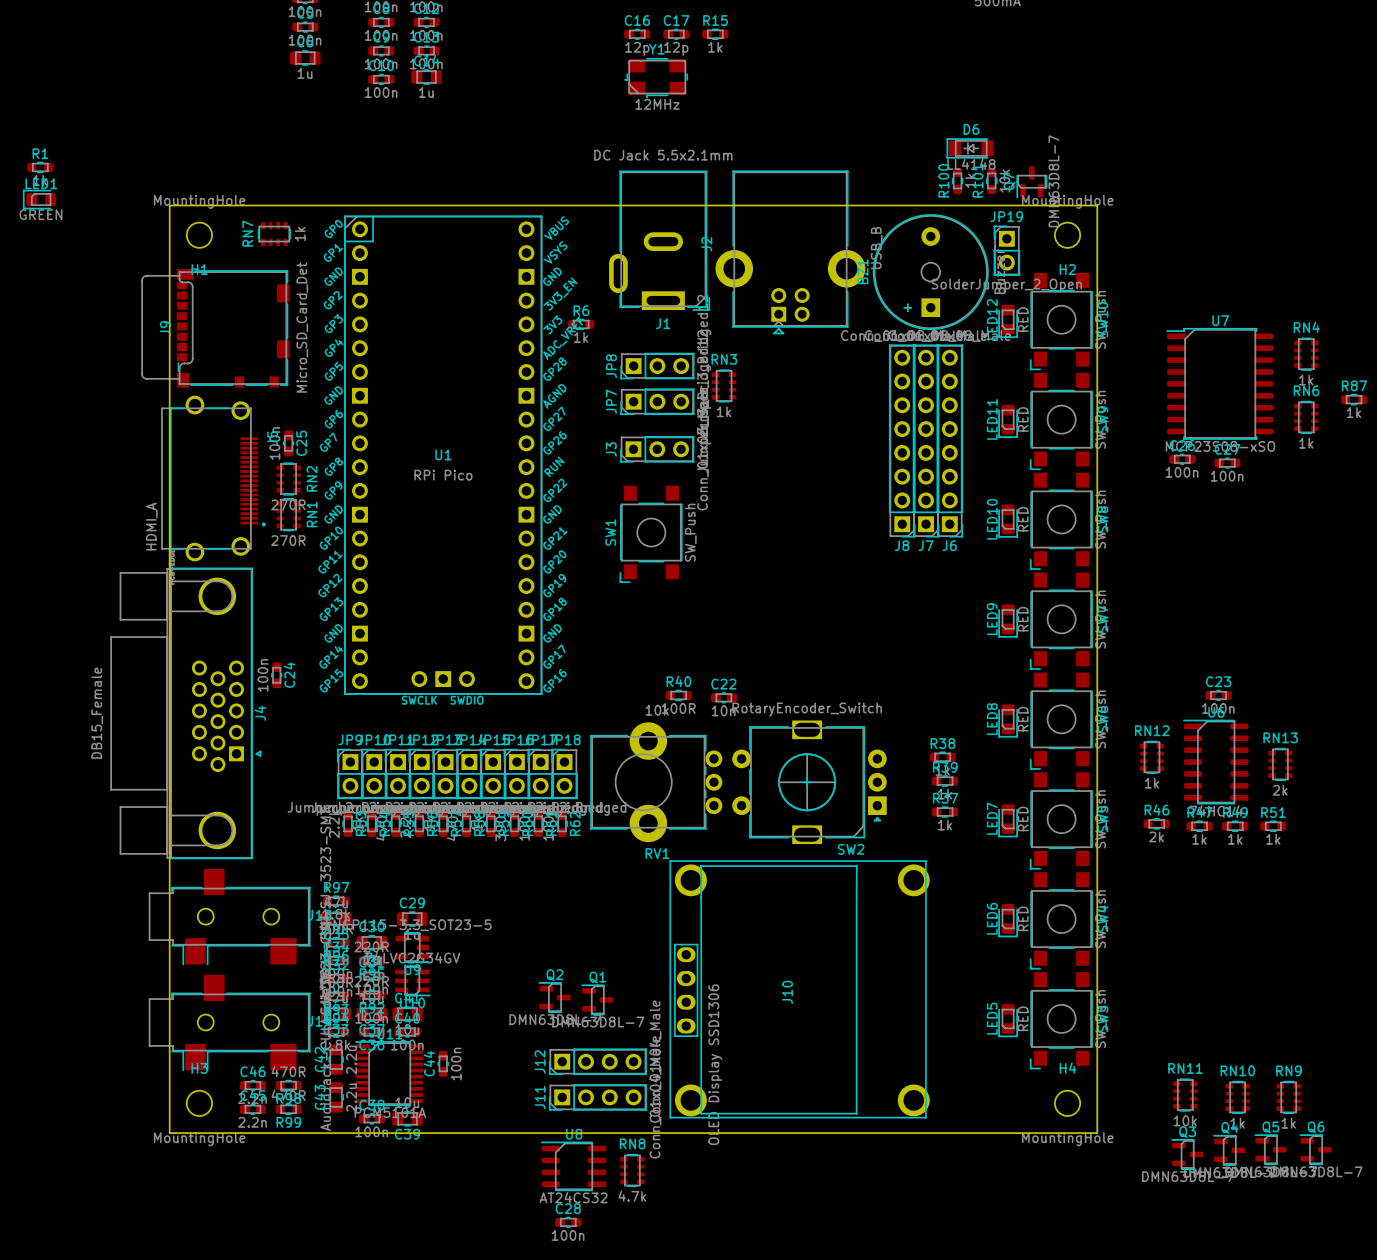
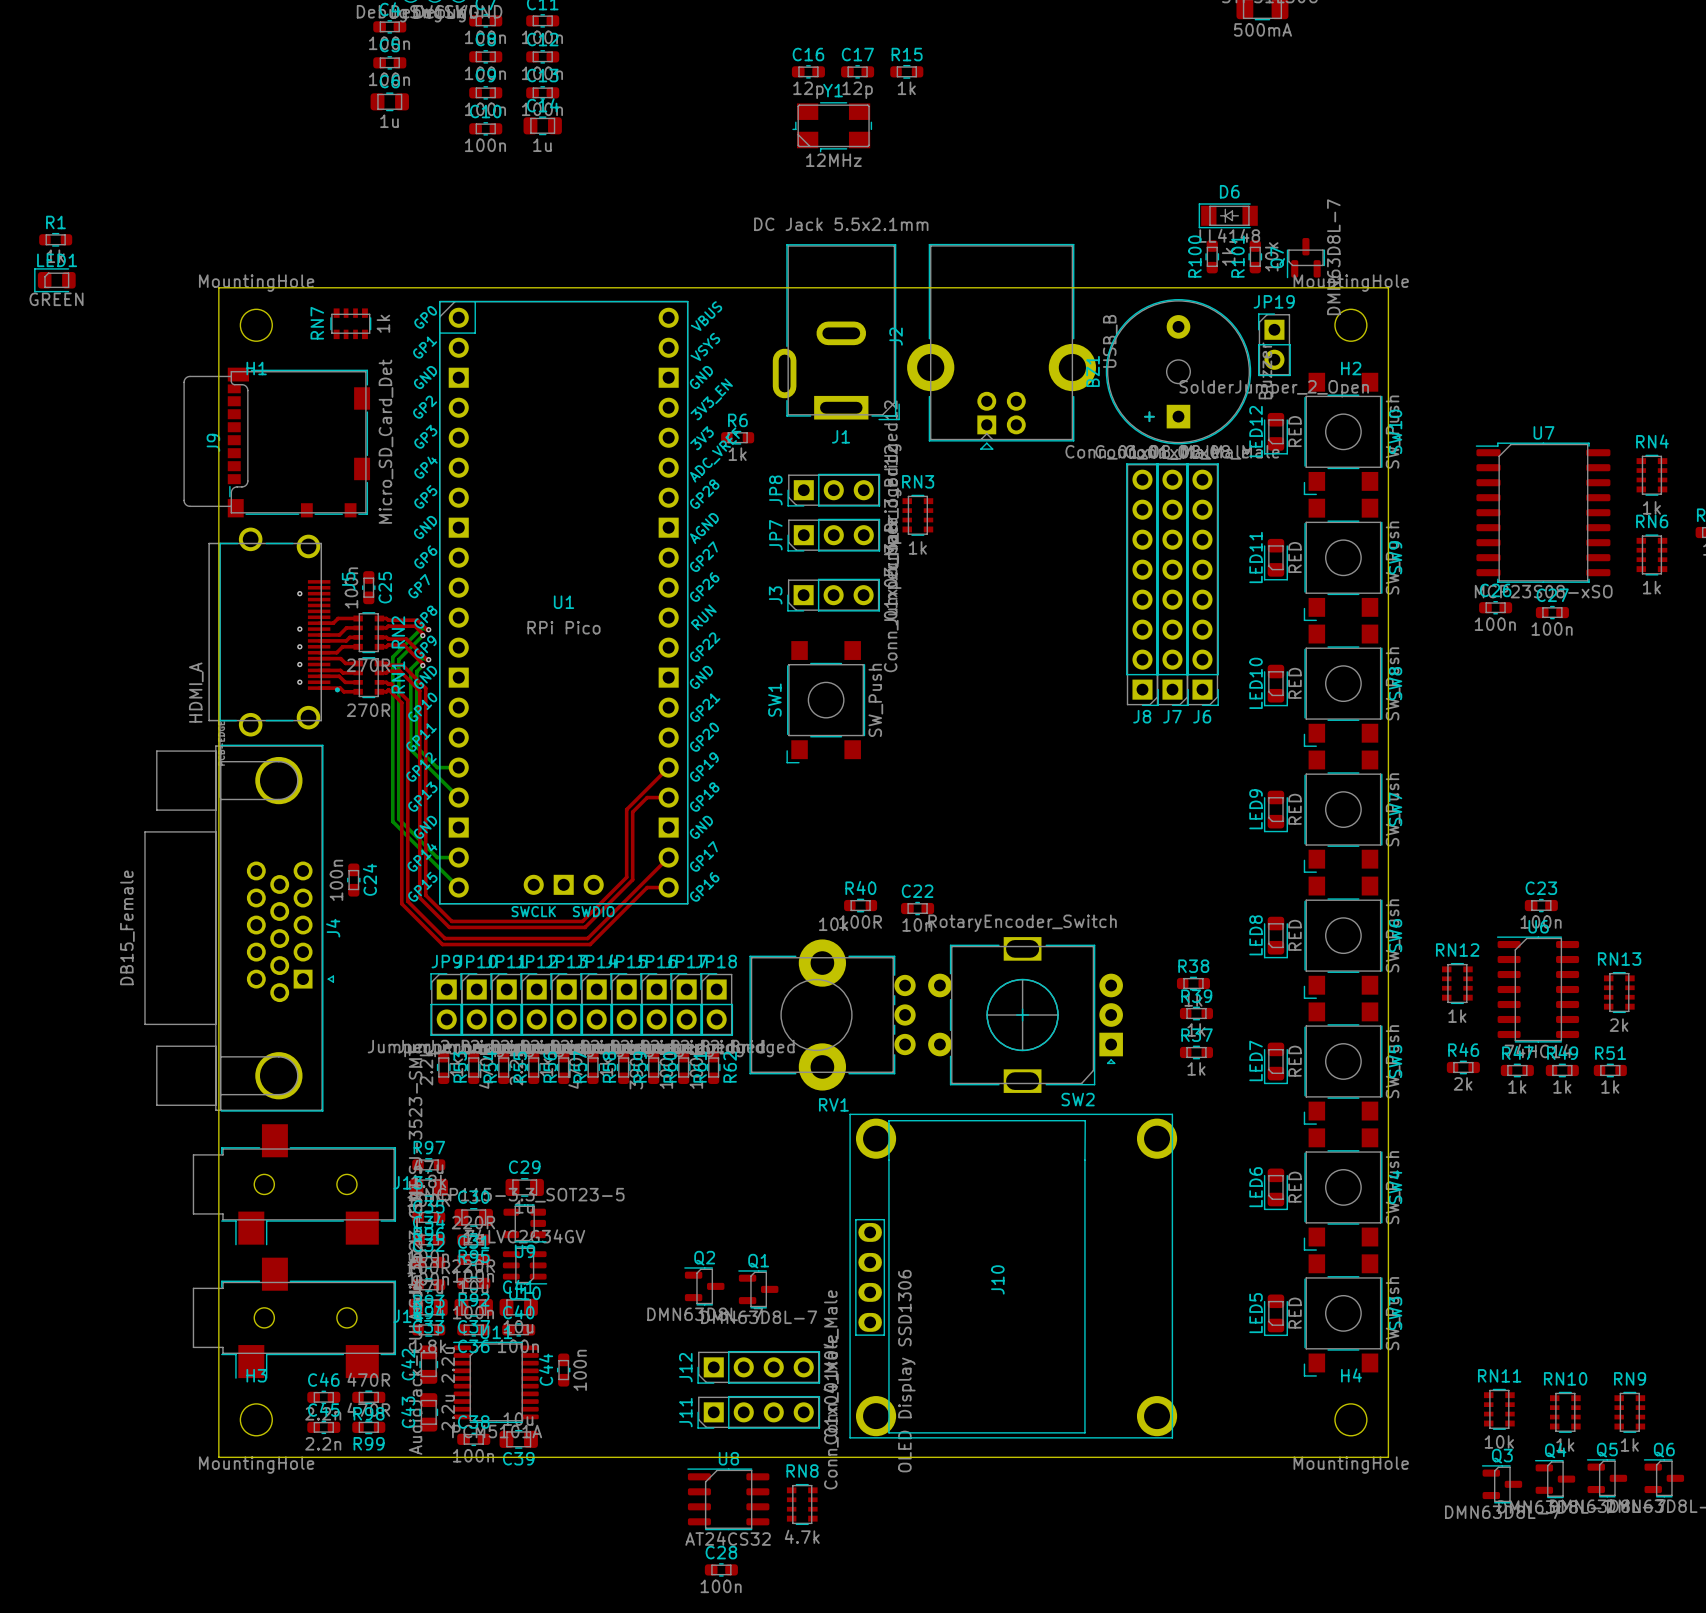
via: none -> (299, 593)
top track: none -> (358, 618) (338, 618) (333, 623) (319, 623)
top track: none -> (379, 618) (417, 620) (428, 629)
top track: none -> (358, 627) (346, 627) (339, 635) (319, 635)
top track: none -> (379, 627) (415, 626) (422, 635)
via: none -> (299, 629)
bottom track: none -> (428, 629) (421, 628) (392, 657) (392, 821) (458, 887)
via: none -> (428, 629)
bottom track: none -> (422, 635) (398, 659) (398, 819) (437, 857) (458, 857)
via: none -> (422, 635)
top track: none -> (358, 637) (349, 637) (346, 640) (319, 640)
top track: none -> (379, 637) (406, 639) (428, 659)
via: none -> (299, 646)
top track: none -> (358, 646) (342, 646) (336, 652) (319, 652)
top track: none -> (379, 646) (403, 645) (422, 665)
top track: none -> (319, 658) (340, 658) (345, 663) (358, 663)
bottom track: none -> (428, 659) (421, 658) (410, 669) (410, 749) (458, 797)
via: none -> (428, 659)
top track: none -> (379, 663) (402, 665) (425, 688) (425, 895) (451, 921) (582, 921) (626, 877) (626, 809) (668, 767)
via: none -> (299, 664)
bottom track: none -> (422, 665) (416, 671) (416, 747) (437, 767) (458, 767)
via: none -> (422, 665)
top track: none -> (319, 670) (358, 672)
top track: none -> (379, 672) (400, 671) (419, 690) (419, 897) (449, 927) (585, 927) (632, 879) (632, 812) (647, 797) (668, 797)
top track: none -> (319, 676) (339, 676) (345, 682) (358, 682)
via: none -> (299, 682)
top track: none -> (379, 682) (391, 684) (407, 700) (407, 901) (445, 938) (587, 938) (668, 857)
top track: none -> (319, 688) (340, 688) (343, 691) (358, 691)
top track: none -> (379, 691) (388, 690) (401, 702) (401, 903) (442, 944) (590, 944) (647, 887) (668, 887)

